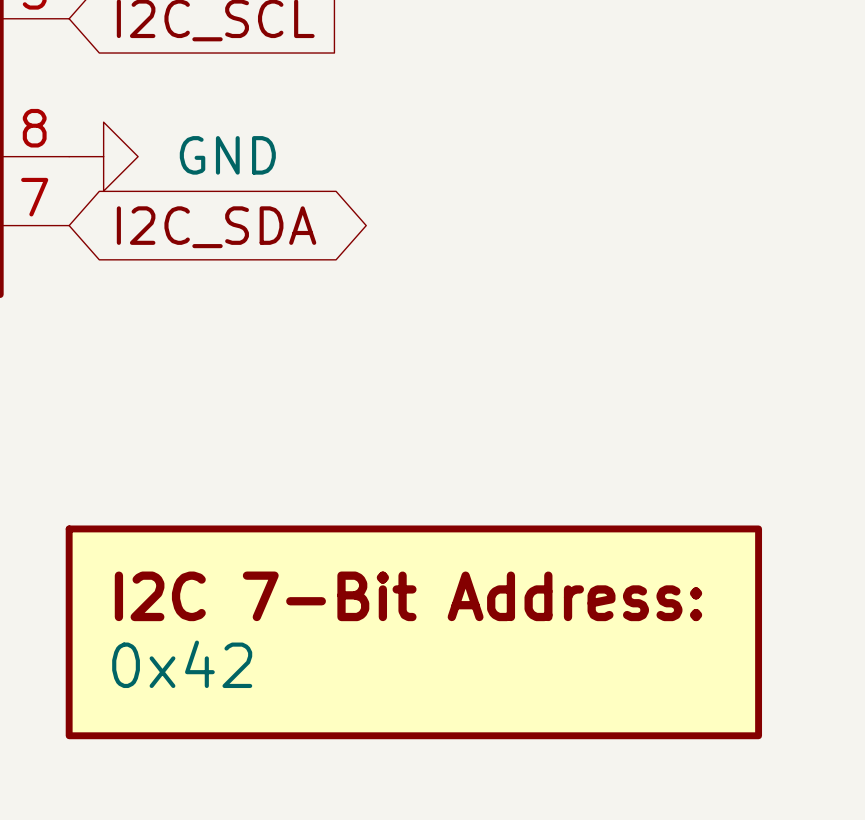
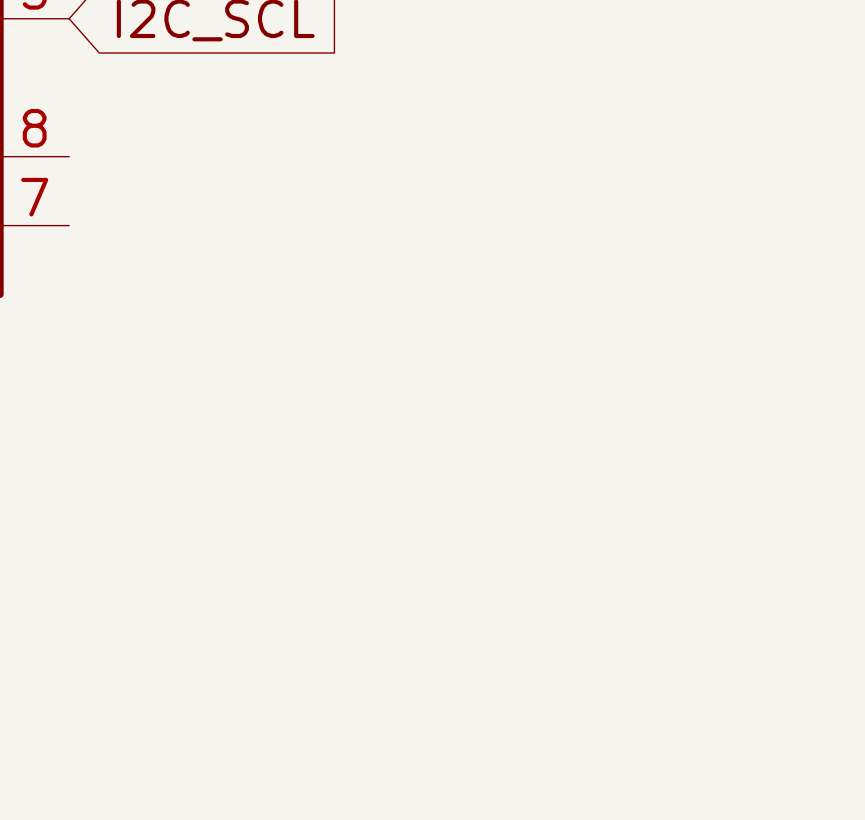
power symbol: GND (103, 156) -> none
global label: I2C_SDA (216, 227) -> none
part: 0x42 (413, 632) -> none

